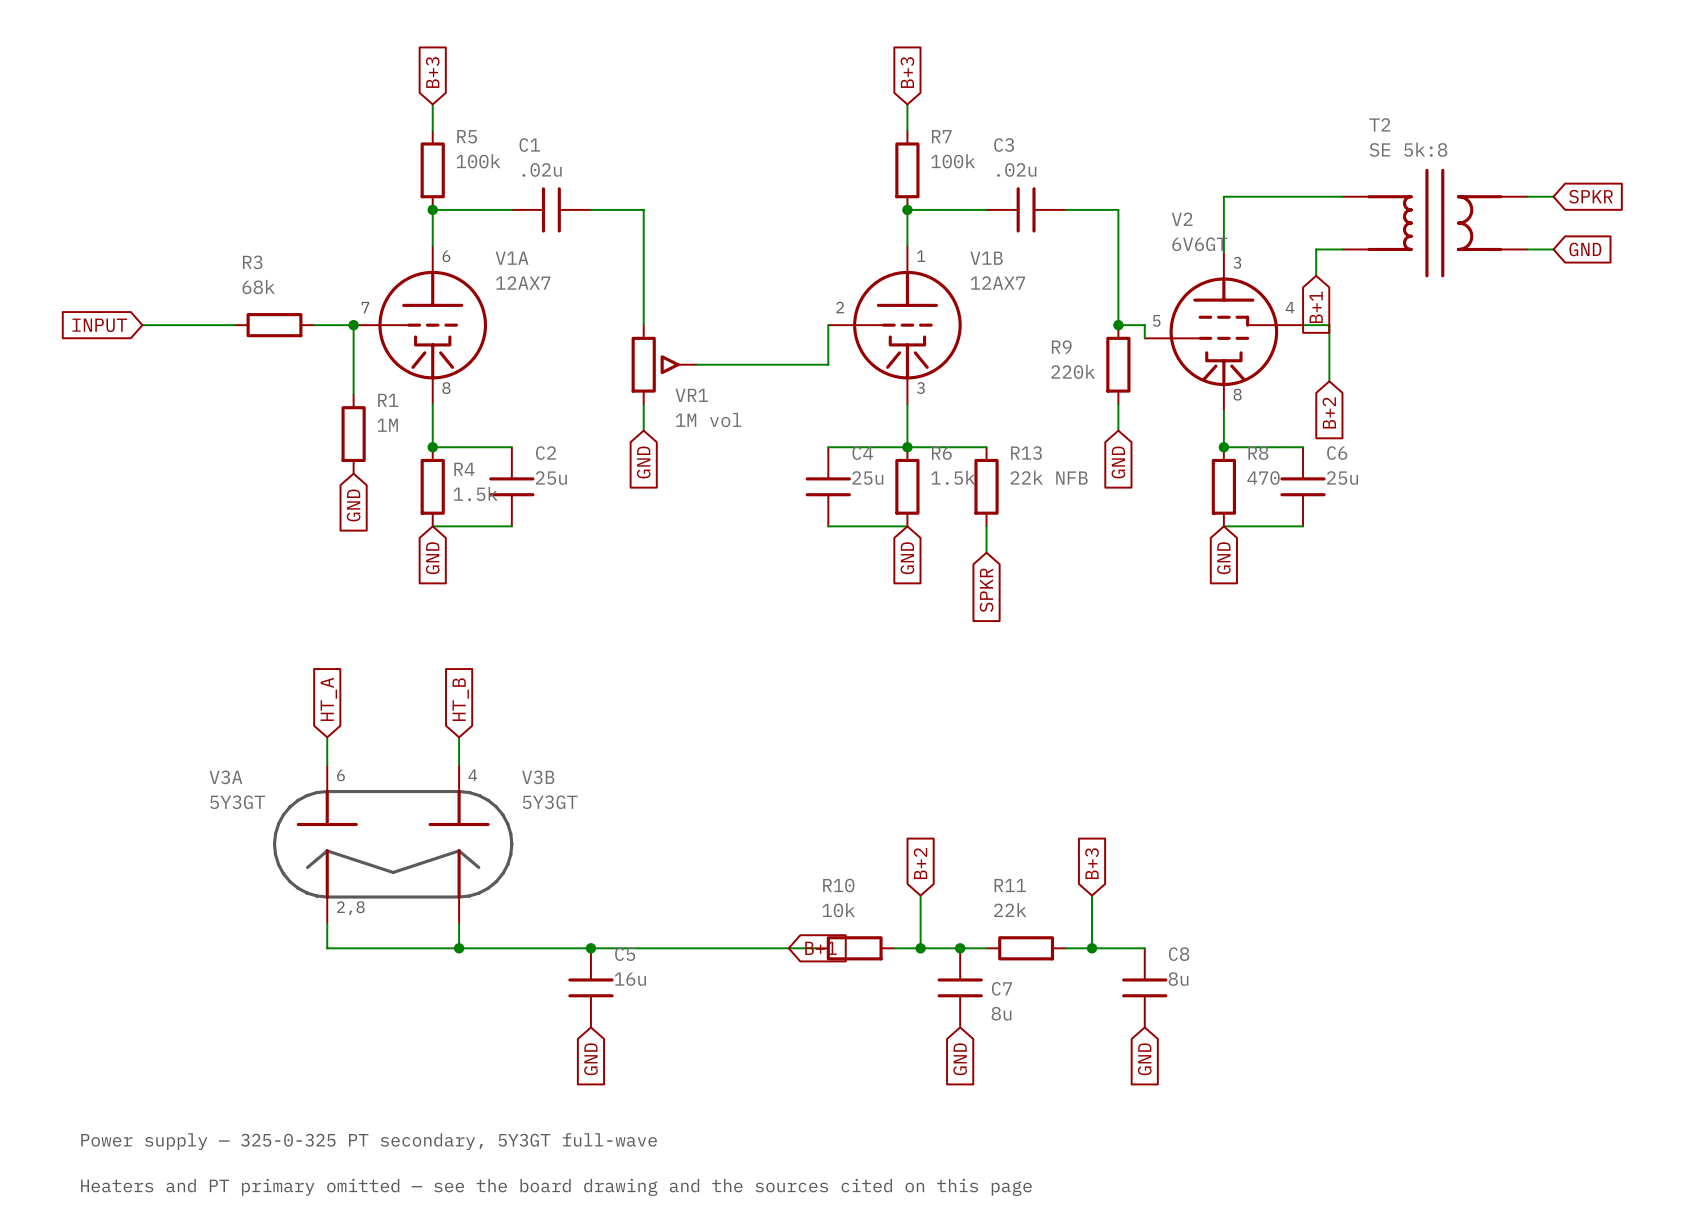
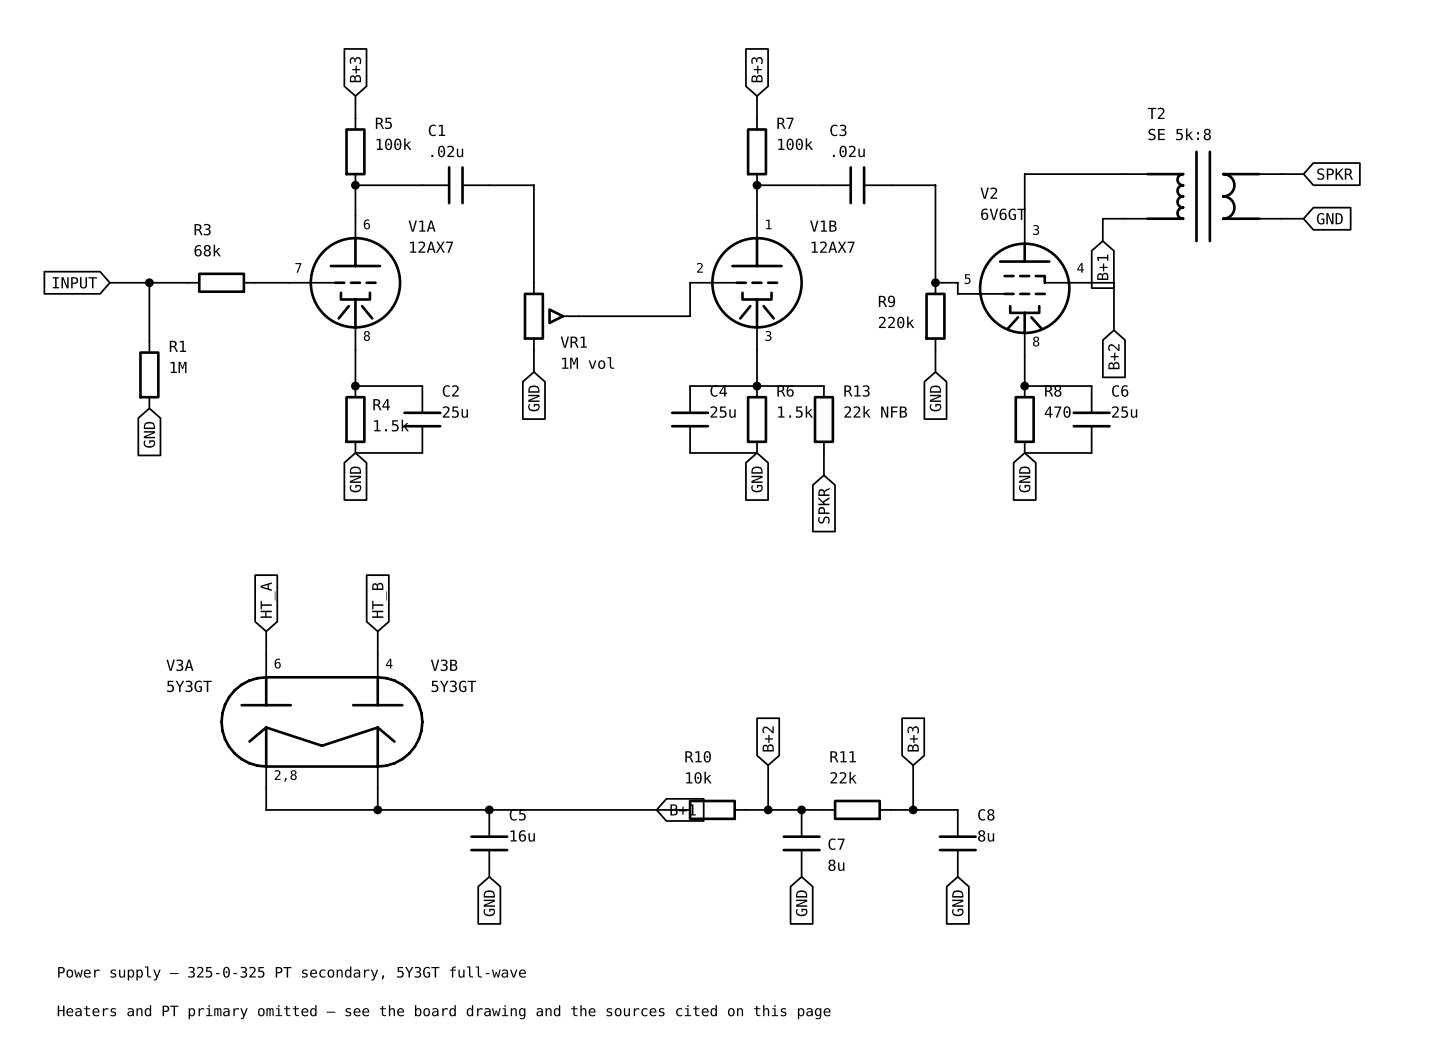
junction: none -> (149, 282)
wire: (353, 325) (353, 394) -> (149, 282) (149, 341)
junction: (353, 325) -> none
R1 position: (353, 434) -> (149, 374)
global label position: GND (353, 505) -> GND (149, 434)

